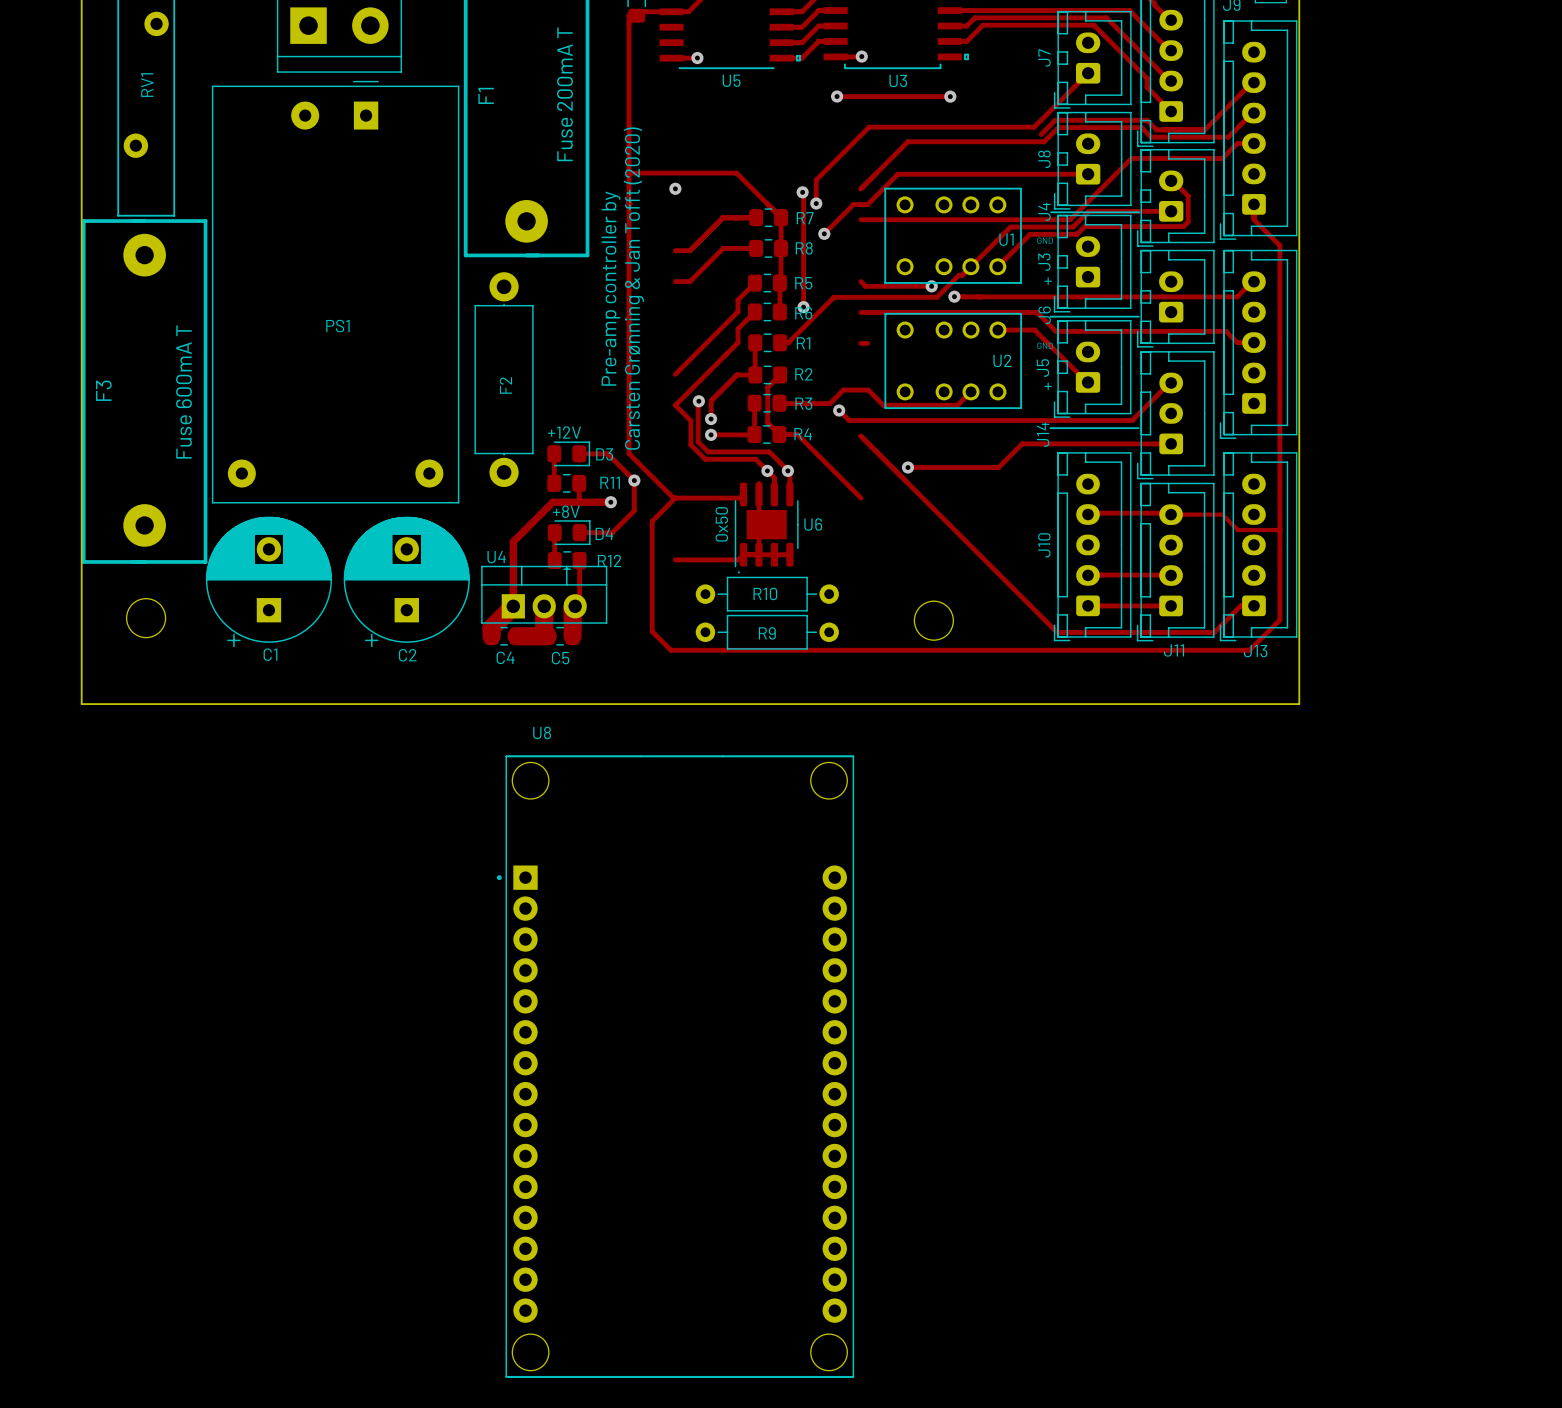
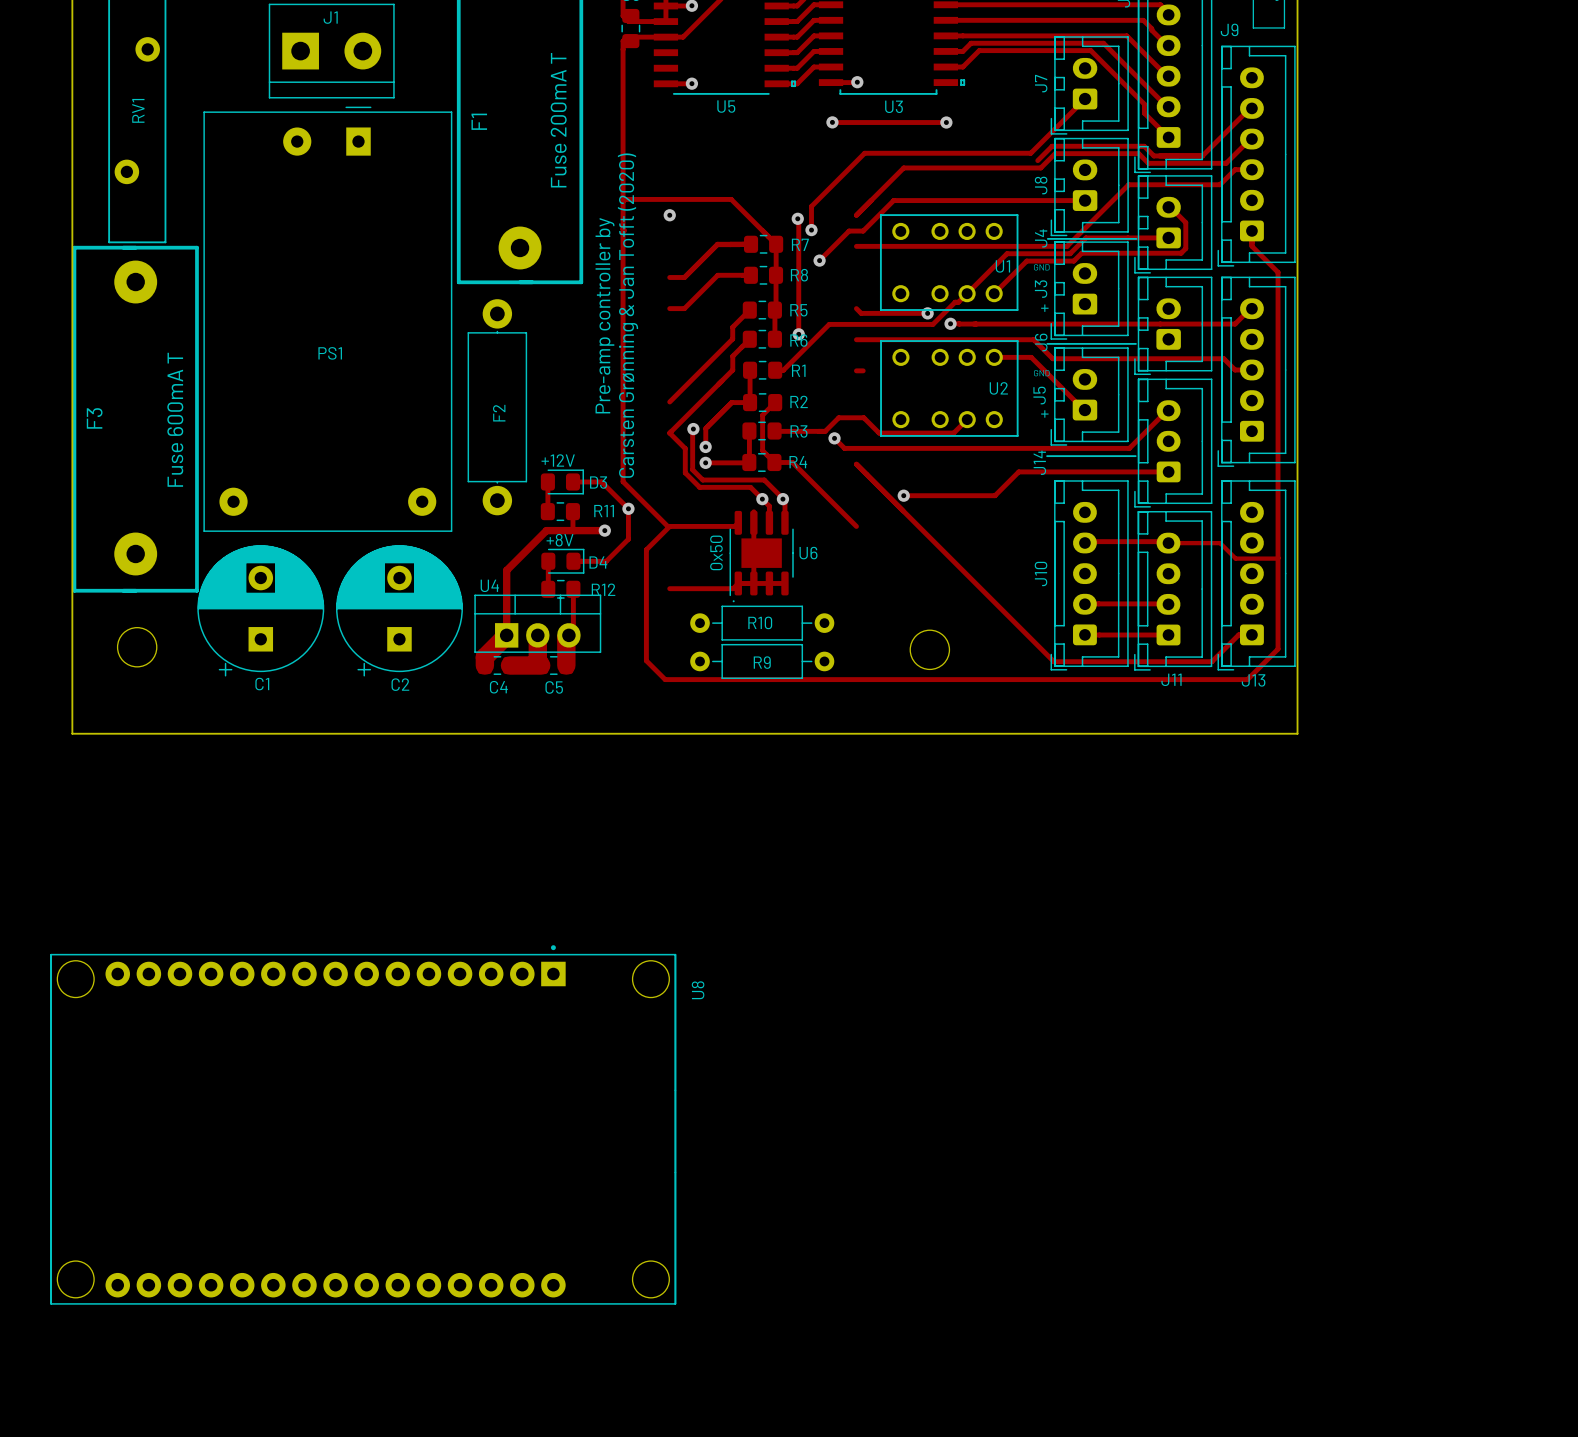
U8 rotation: 0° (675, 1066) -> 90° clockwise (363, 1124)

